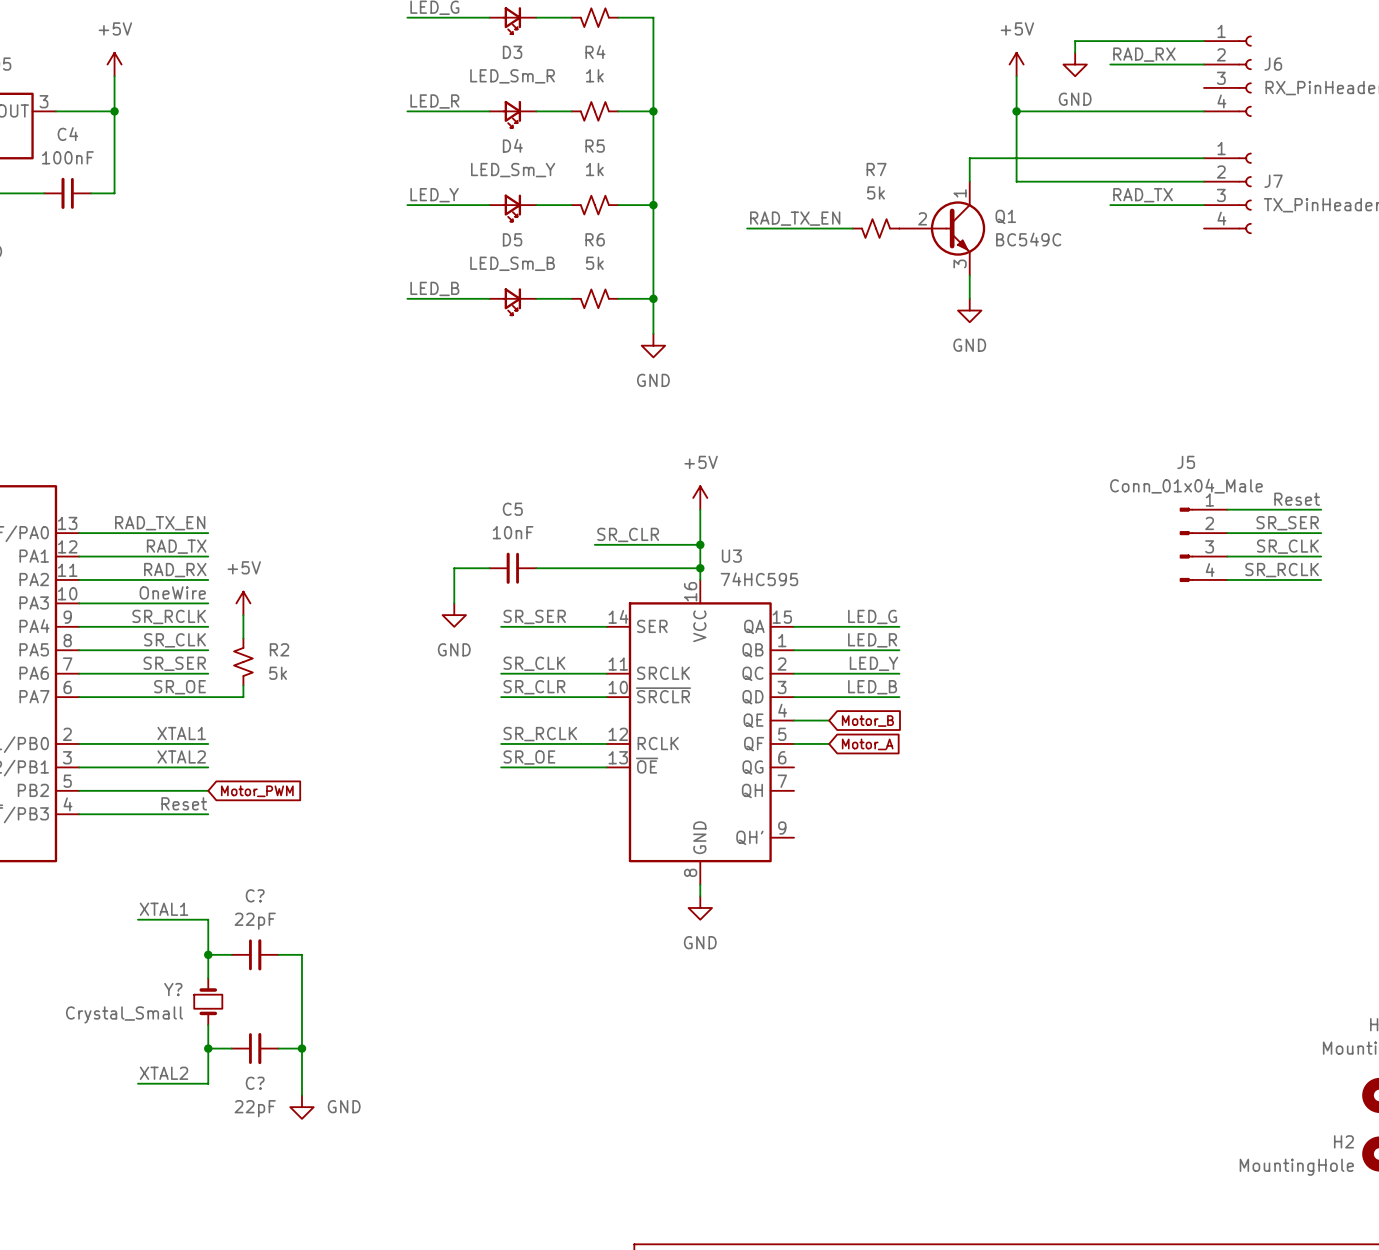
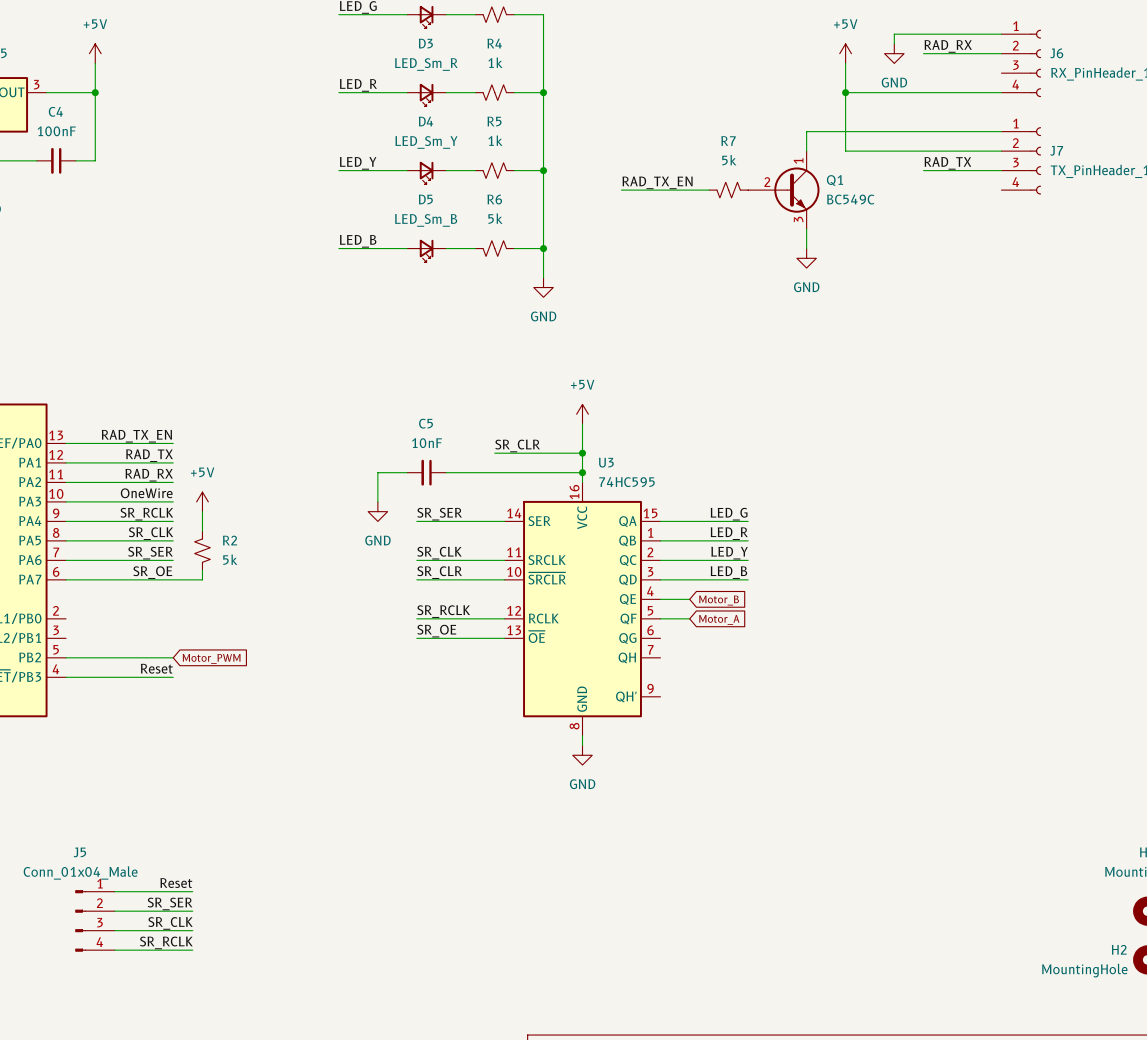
label: Reset (1297, 499) -> none
wire: (1227, 509) (1321, 509) -> none
label: SR_SER (1287, 523) -> none
wire: (1227, 533) (1321, 533) -> none
J5 position: (1203, 544) -> (94, 920)
label: SR_CLK (1287, 546) -> none
wire: (1227, 556) (1321, 556) -> none
label: SR_RCLK (1282, 570) -> none
wire: (1227, 579) (1321, 579) -> none
label: XTAL1 (181, 733) -> none
wire: (79, 743) (208, 743) -> none
label: XTAL2 (181, 756) -> none
wire: (79, 767) (208, 767) -> none
label: XTAL1 (164, 909) -> none
wire: (137, 919) (208, 919) (208, 978) -> none
wire: (208, 954) (231, 954) -> none
junction: (208, 954) -> none
C?: 22pF (255, 954) -> none
wire: (278, 954) (301, 954) (301, 1095) -> none
Y?: Crystal_Small (208, 1001) -> none
wire: (208, 1025) (208, 1083) (137, 1083) -> none
wire: (208, 1048) (231, 1048) -> none
junction: (208, 1048) -> none
C?: 22pF (255, 1048) -> none
wire: (278, 1048) (301, 1048) -> none
junction: (301, 1048) -> none
label: none -> Reset (176, 883)
wire: none -> (114, 891) (192, 891)
label: XTAL2 (164, 1073) -> none
label: none -> SR_SER (170, 903)
wire: none -> (114, 911) (192, 911)
power symbol: GND (301, 1107) -> none
label: none -> SR_CLK (170, 923)
wire: none -> (114, 930) (192, 930)
label: none -> SR_RCLK (166, 942)
wire: none -> (114, 950) (192, 950)

